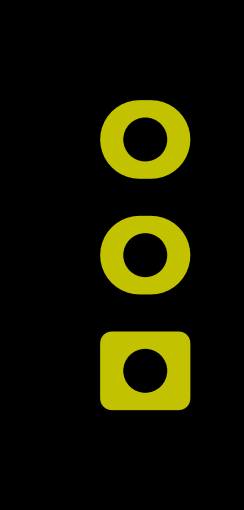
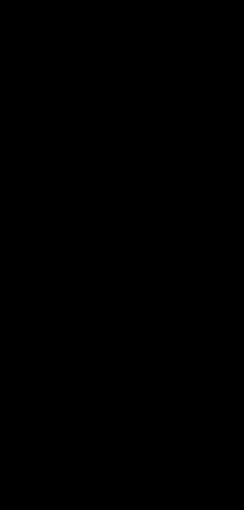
part: (145, 255) -> none

